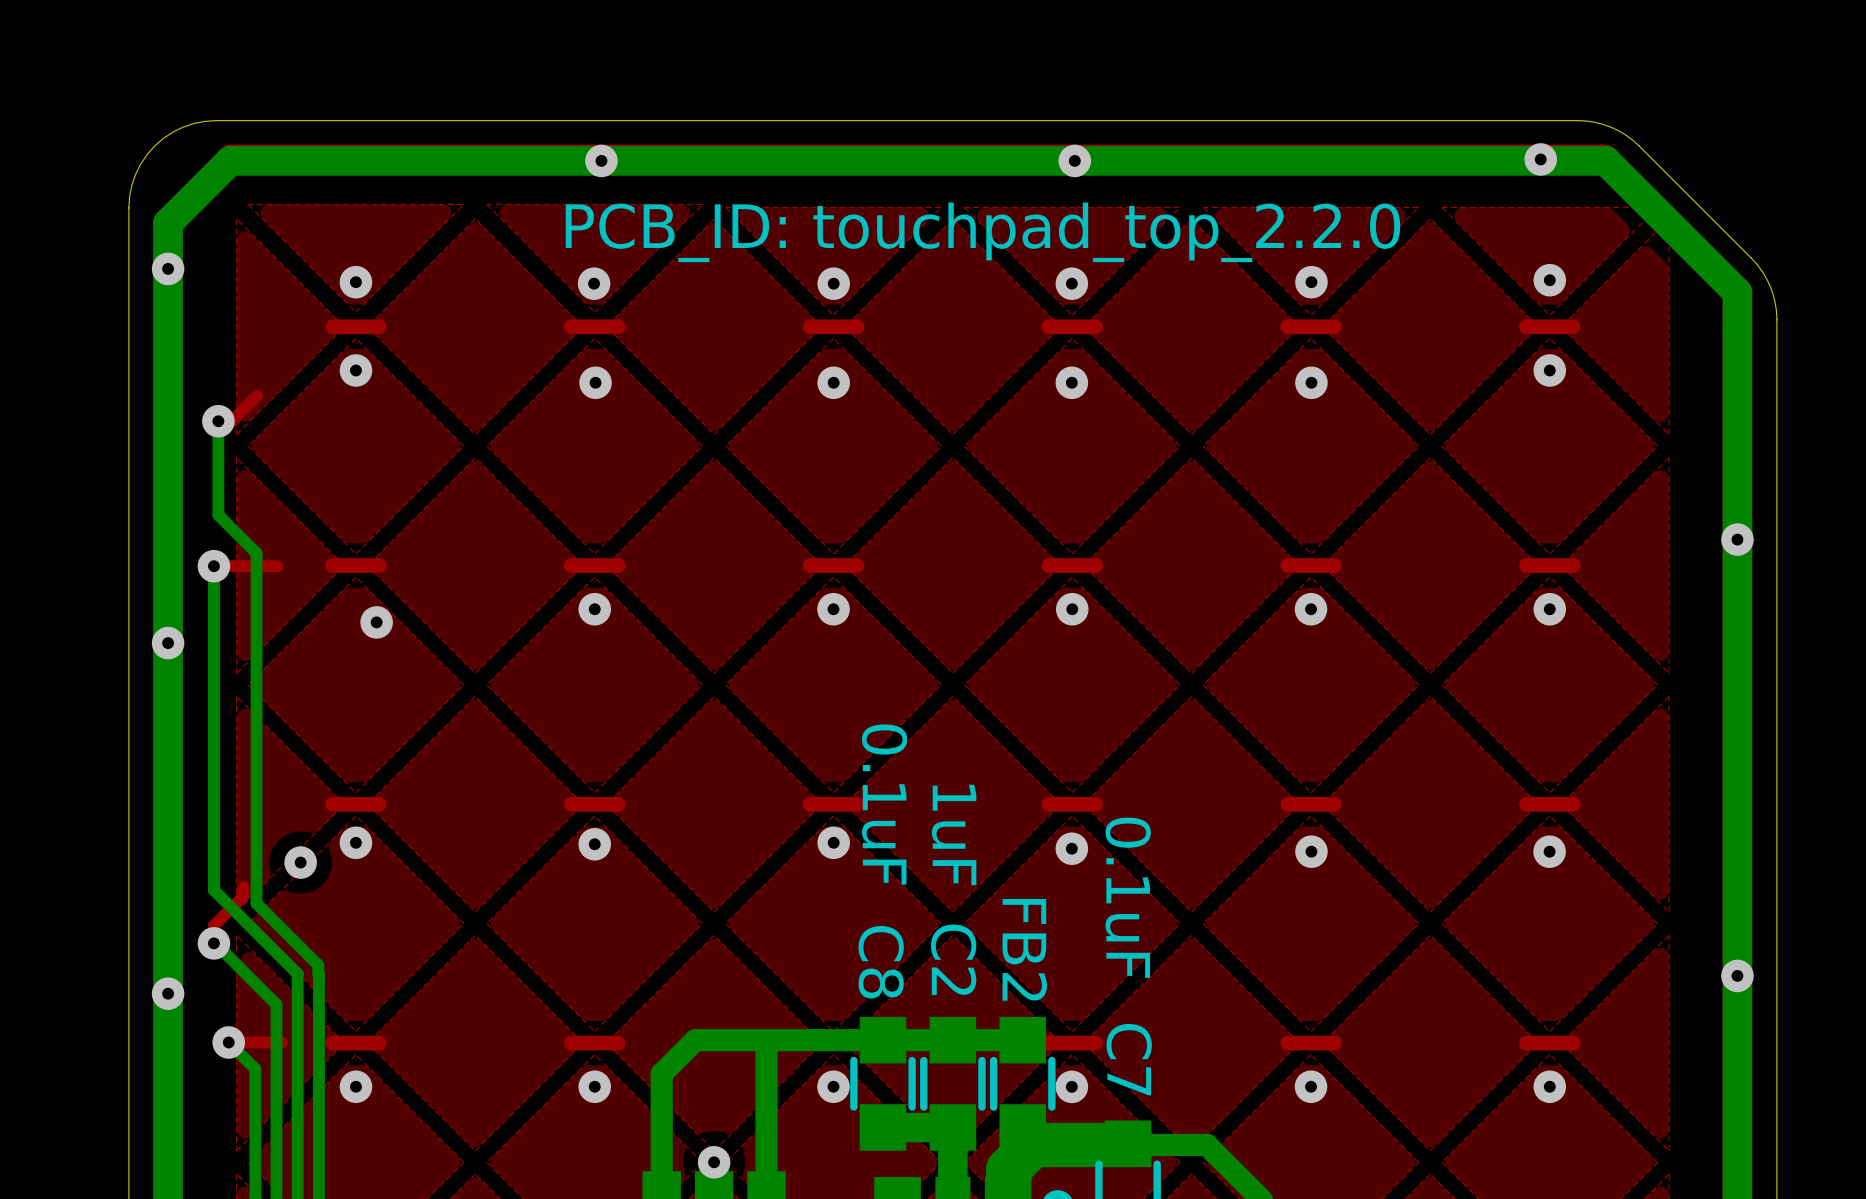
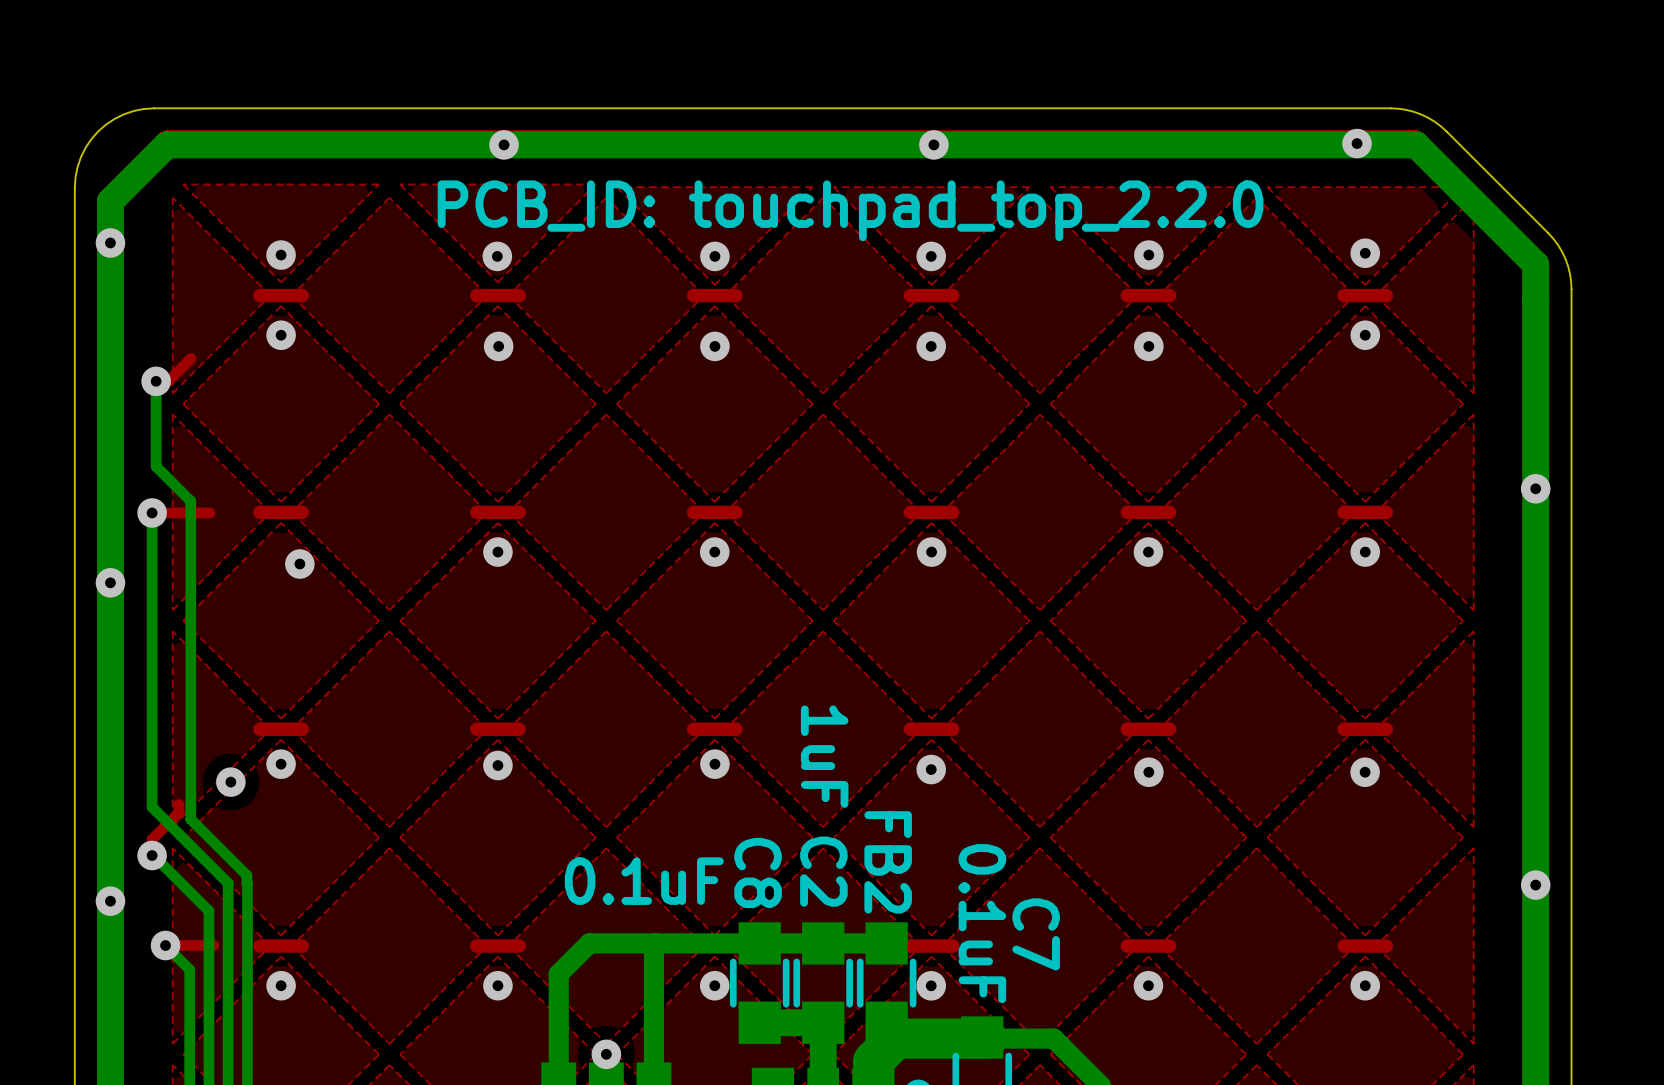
C8 value rotation: 0° (884, 804) -> 90° counterclockwise (644, 881)
C7 value position: 0.1uF (1128, 897) -> 0.1uF (982, 923)
C7 name position: C7 (1129, 1059) -> C7 (1036, 934)

